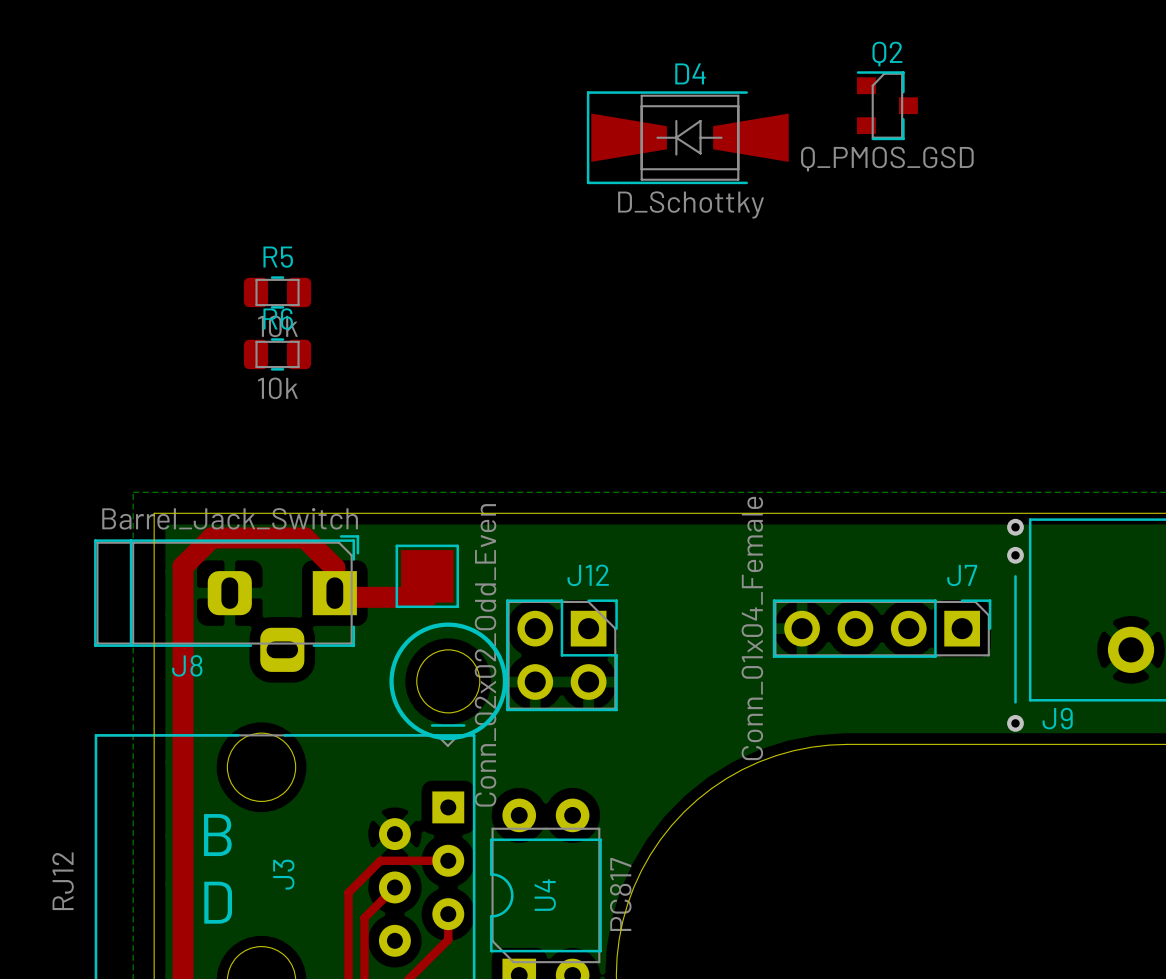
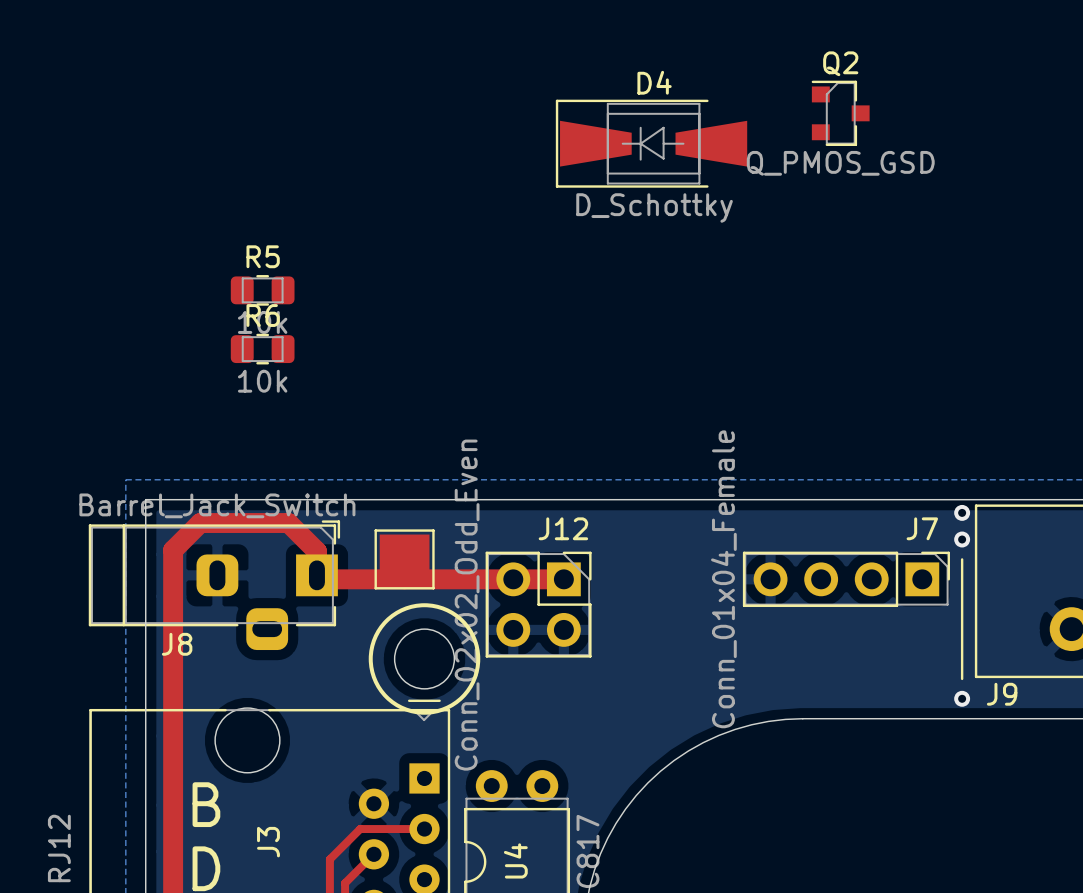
top track: none -> (404, 579) (563, 579)
J7 position: (882, 628) -> (846, 579)
J12 position: (561, 655) -> (538, 604)

